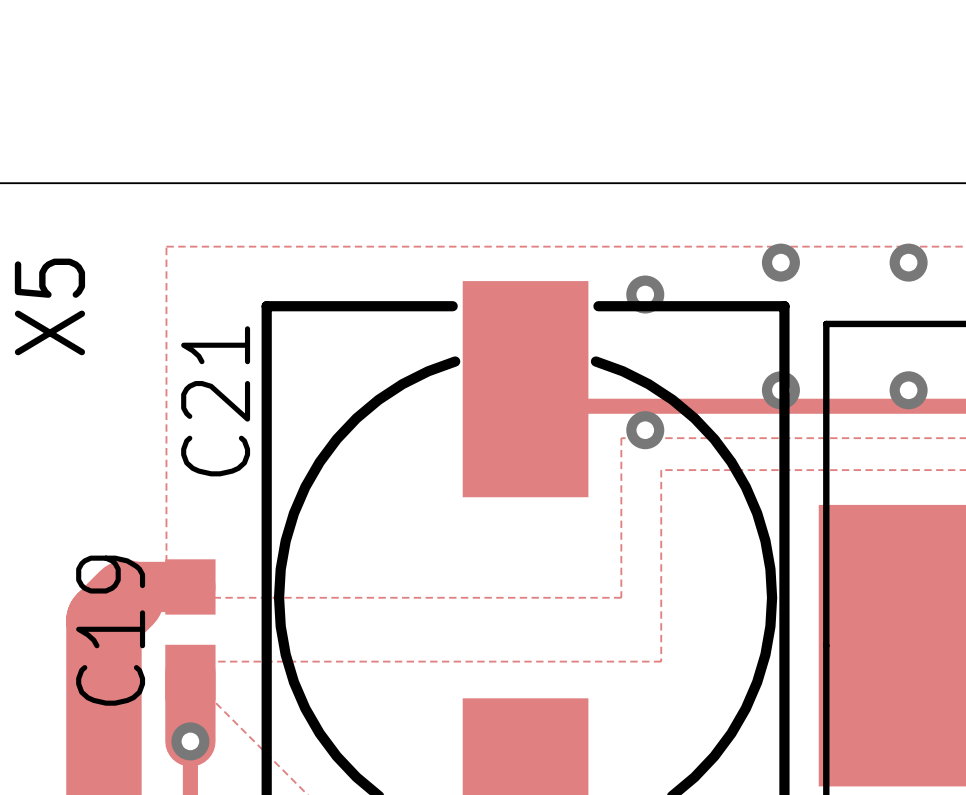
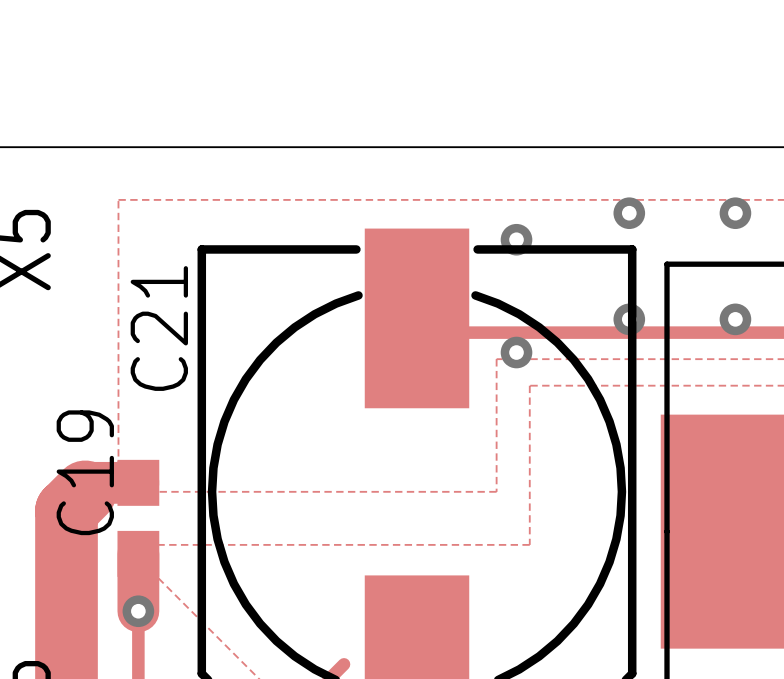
C19 name position: C19 (110, 630) -> C19 (85, 472)

